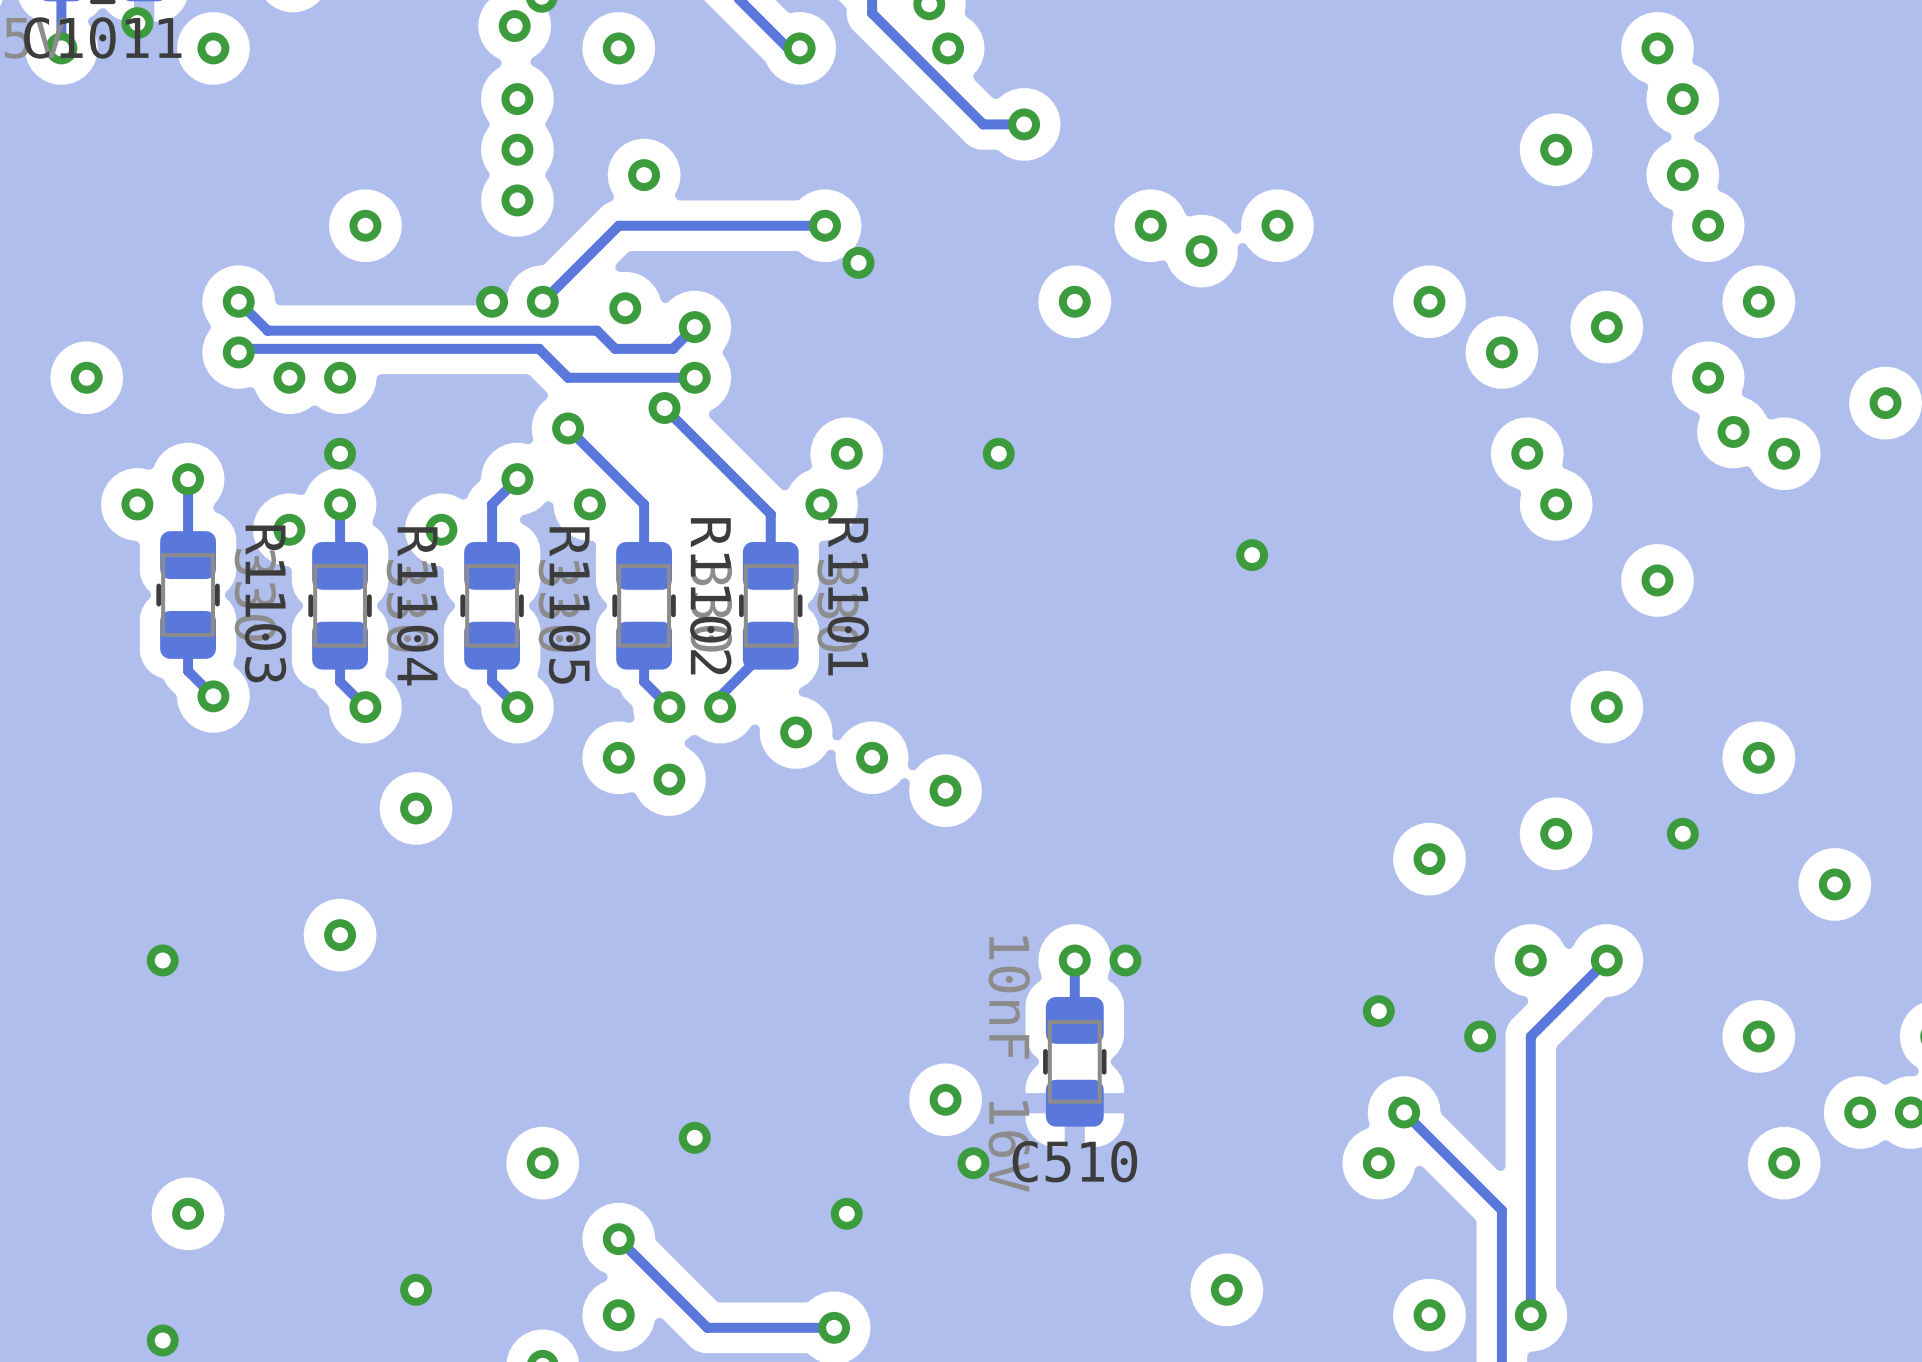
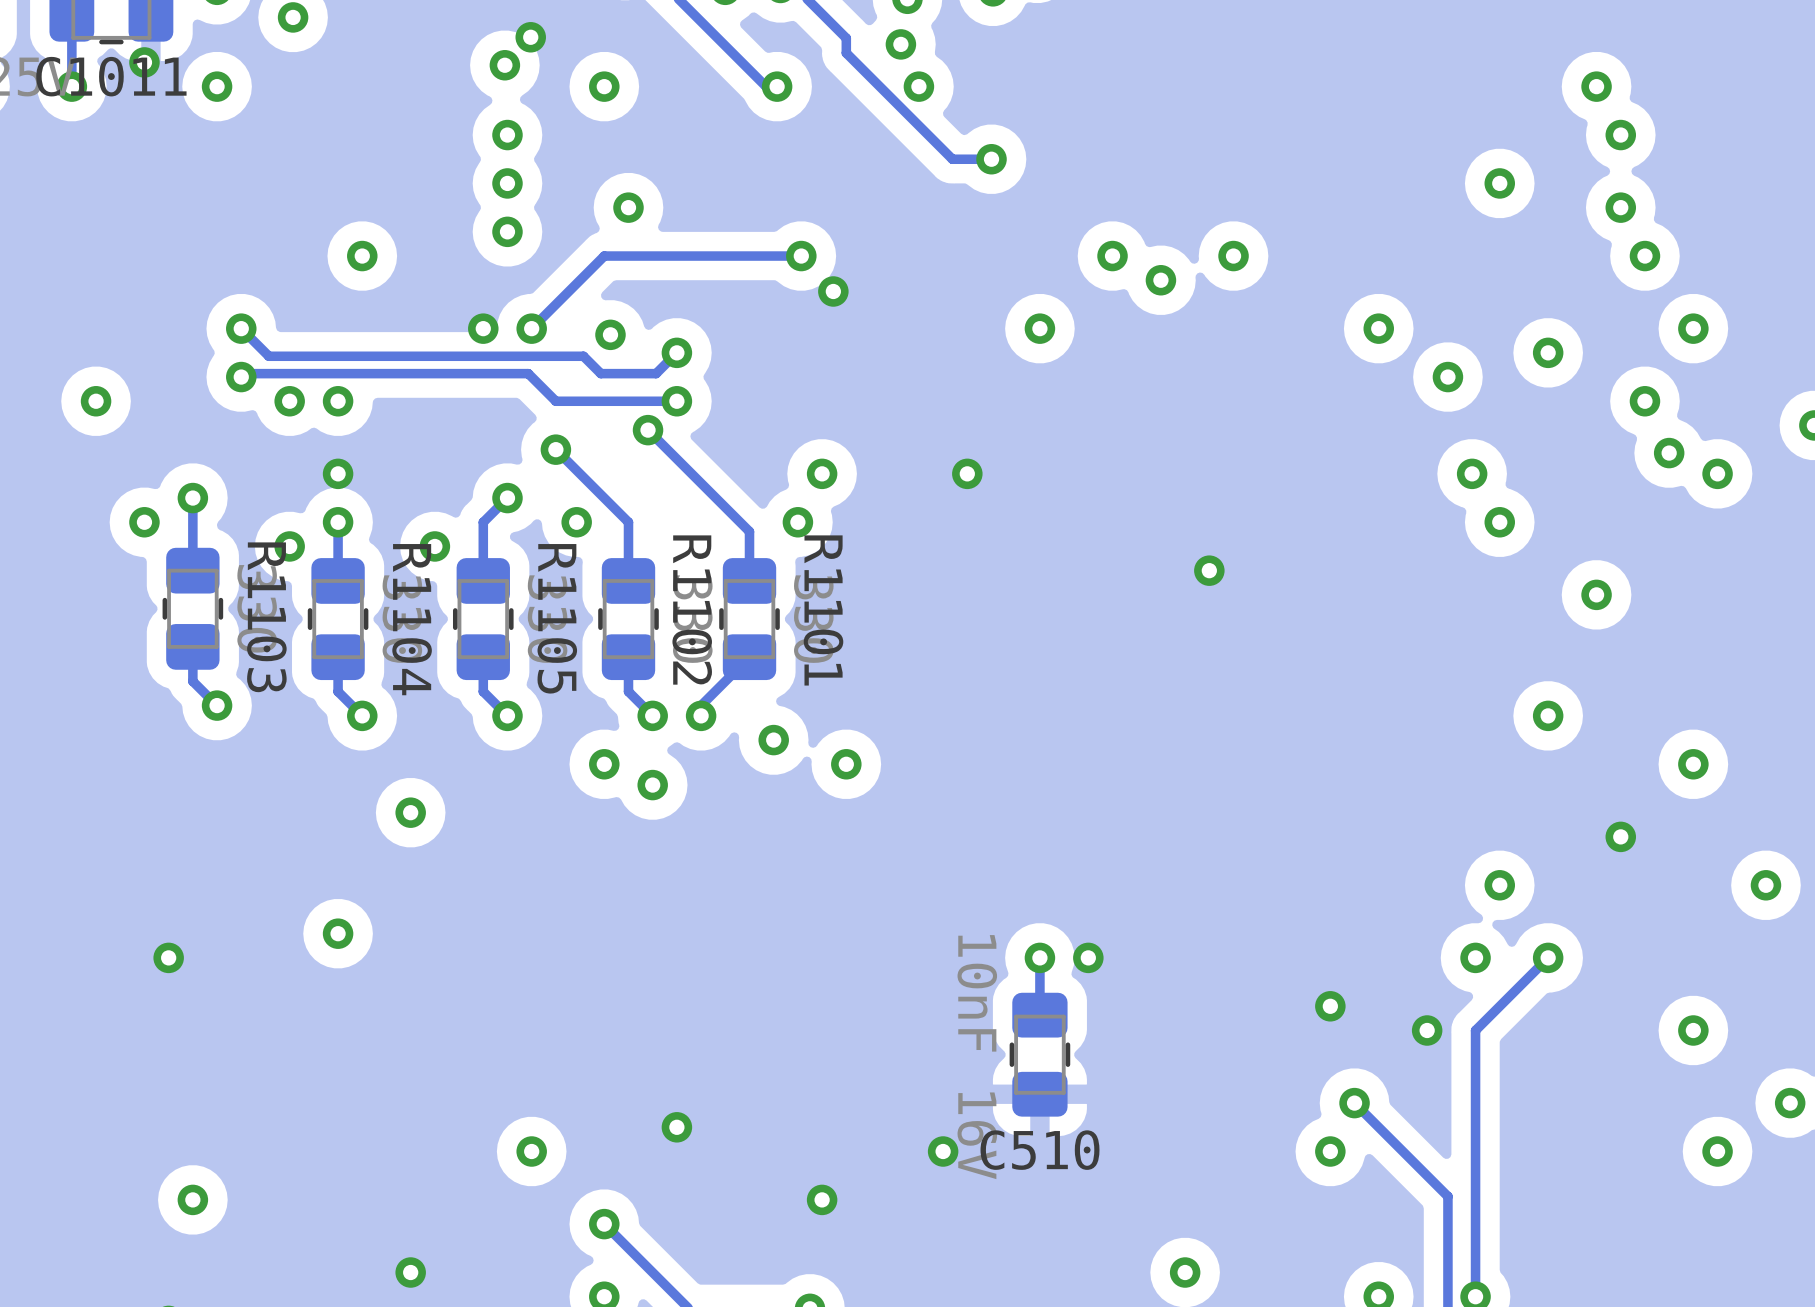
via: (945, 790) -> none
via position: (1556, 833) -> (1499, 885)
via: (1429, 859) -> none
via: (945, 1099) -> none

